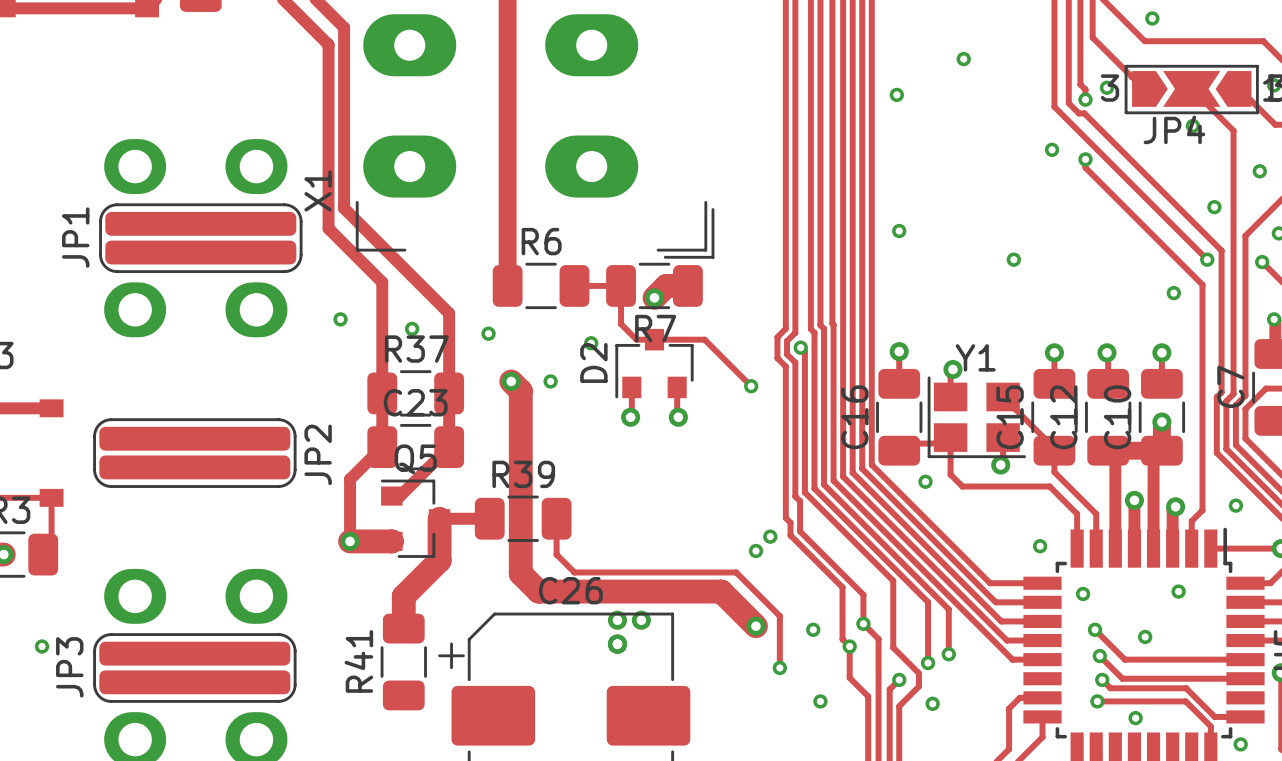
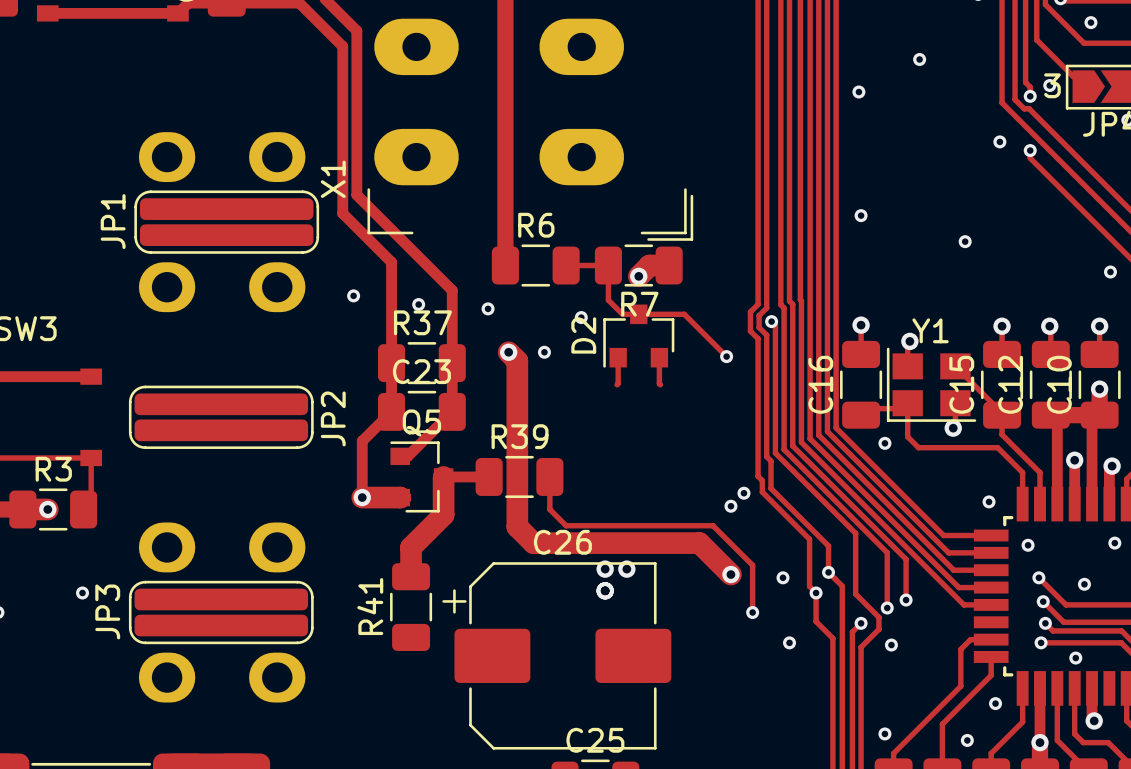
via: (630, 417) -> none
via: (678, 417) -> none

